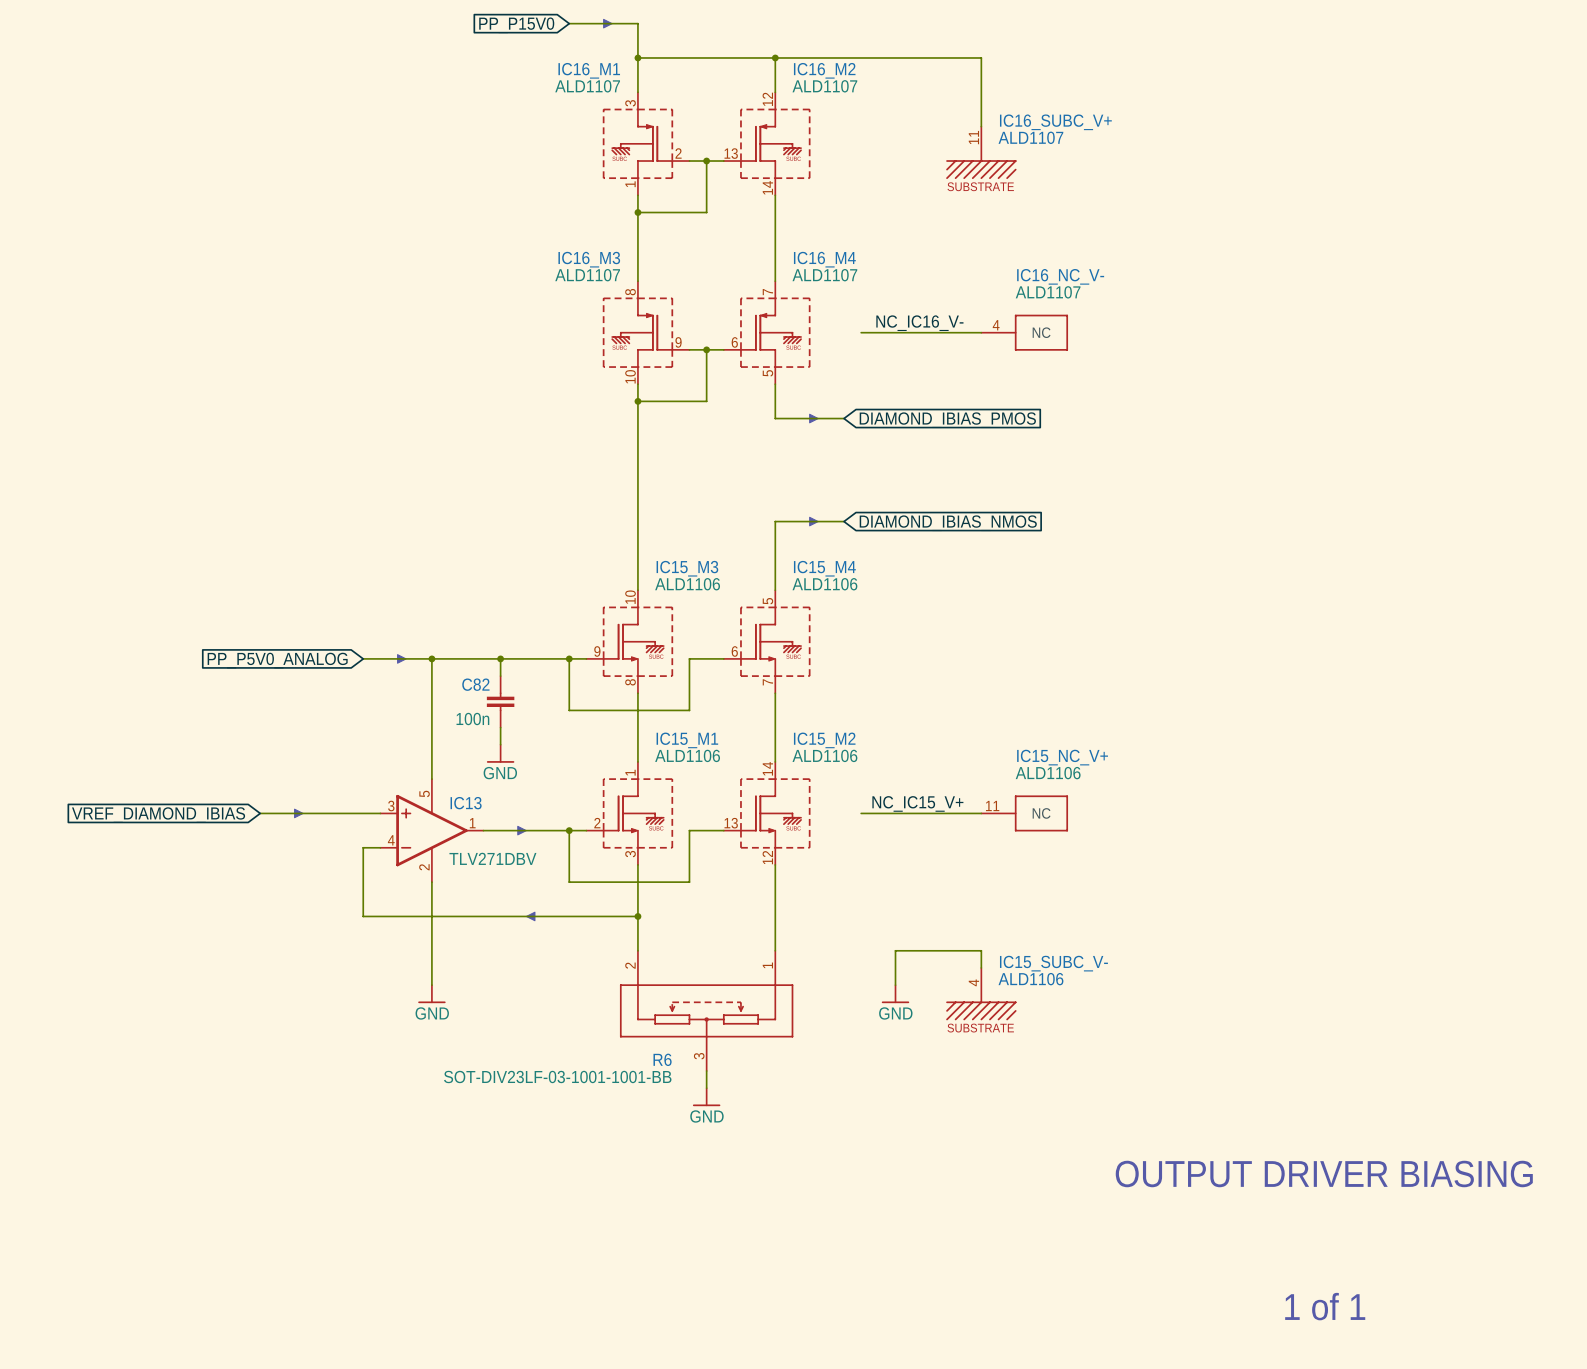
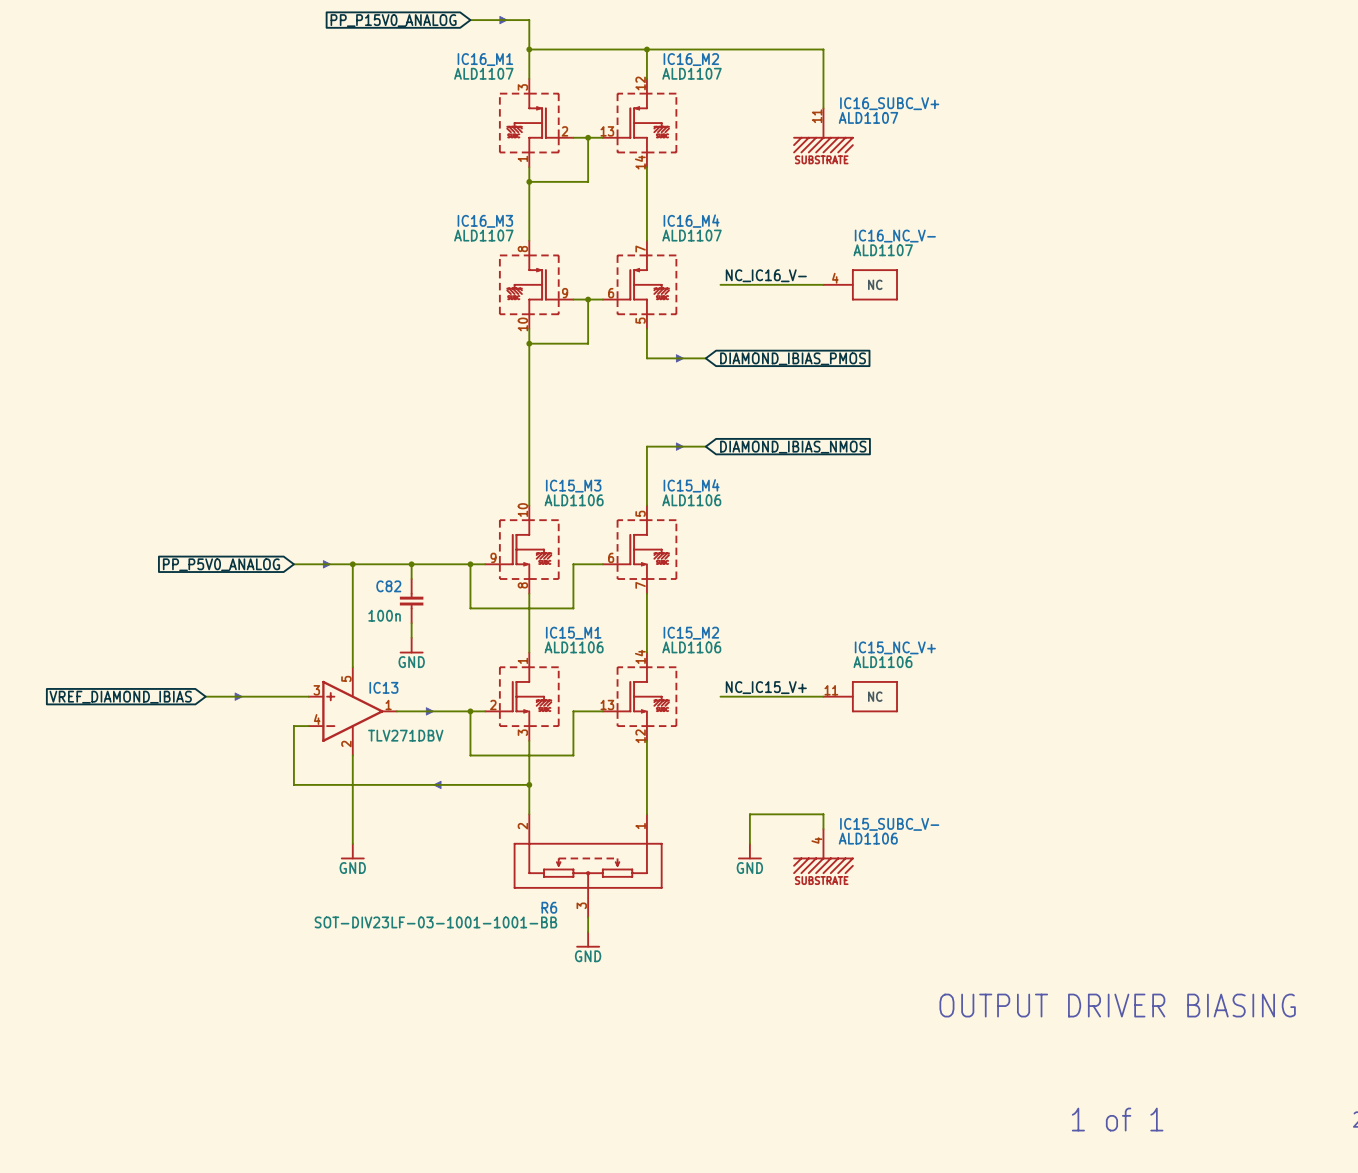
global label: PP_P15V0 (516, 25) -> PP_P15V0_ANALOG (393, 20)

